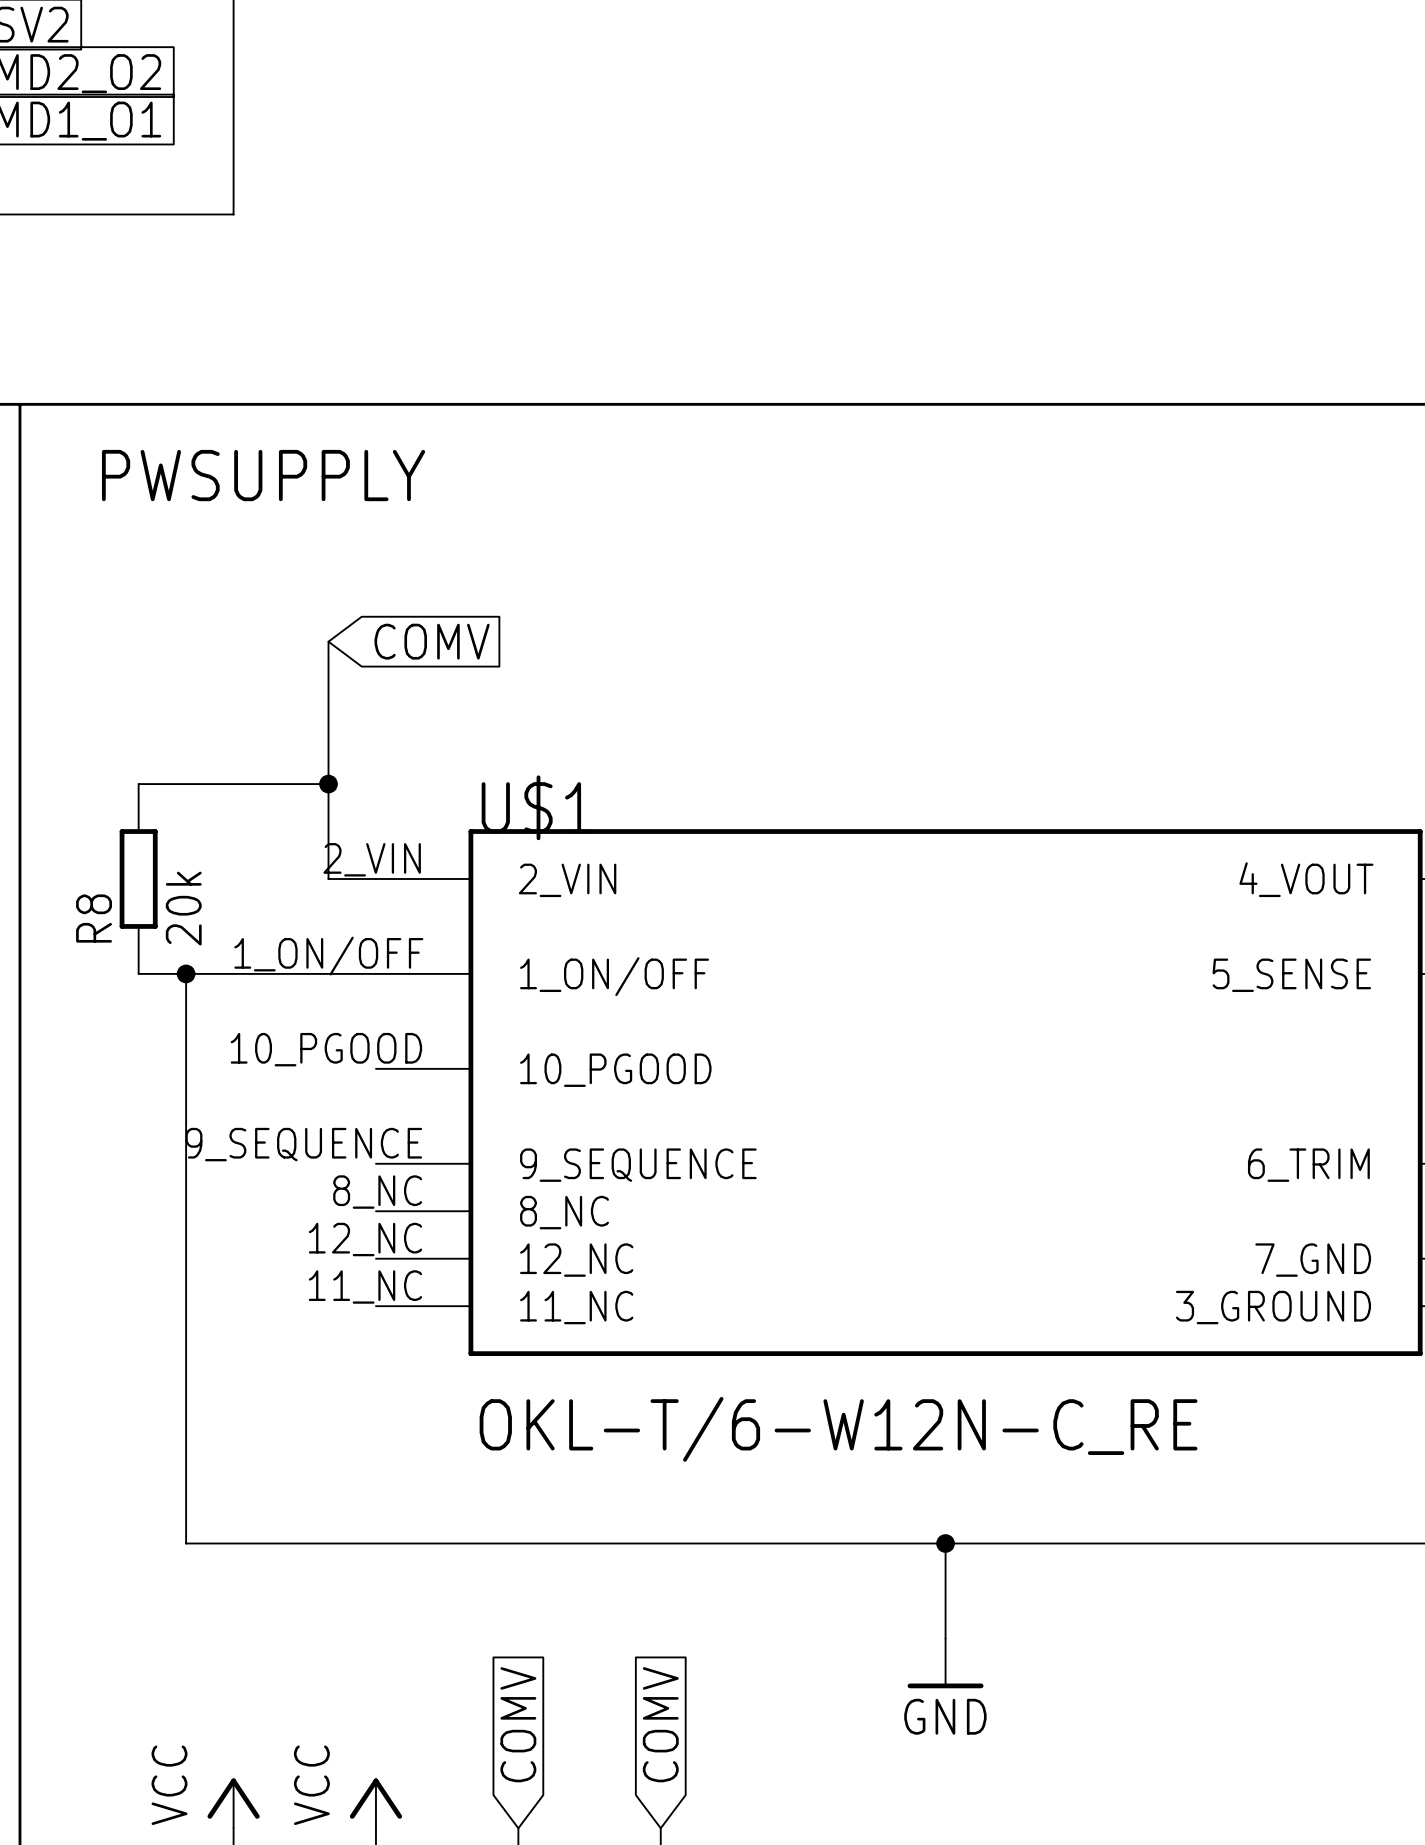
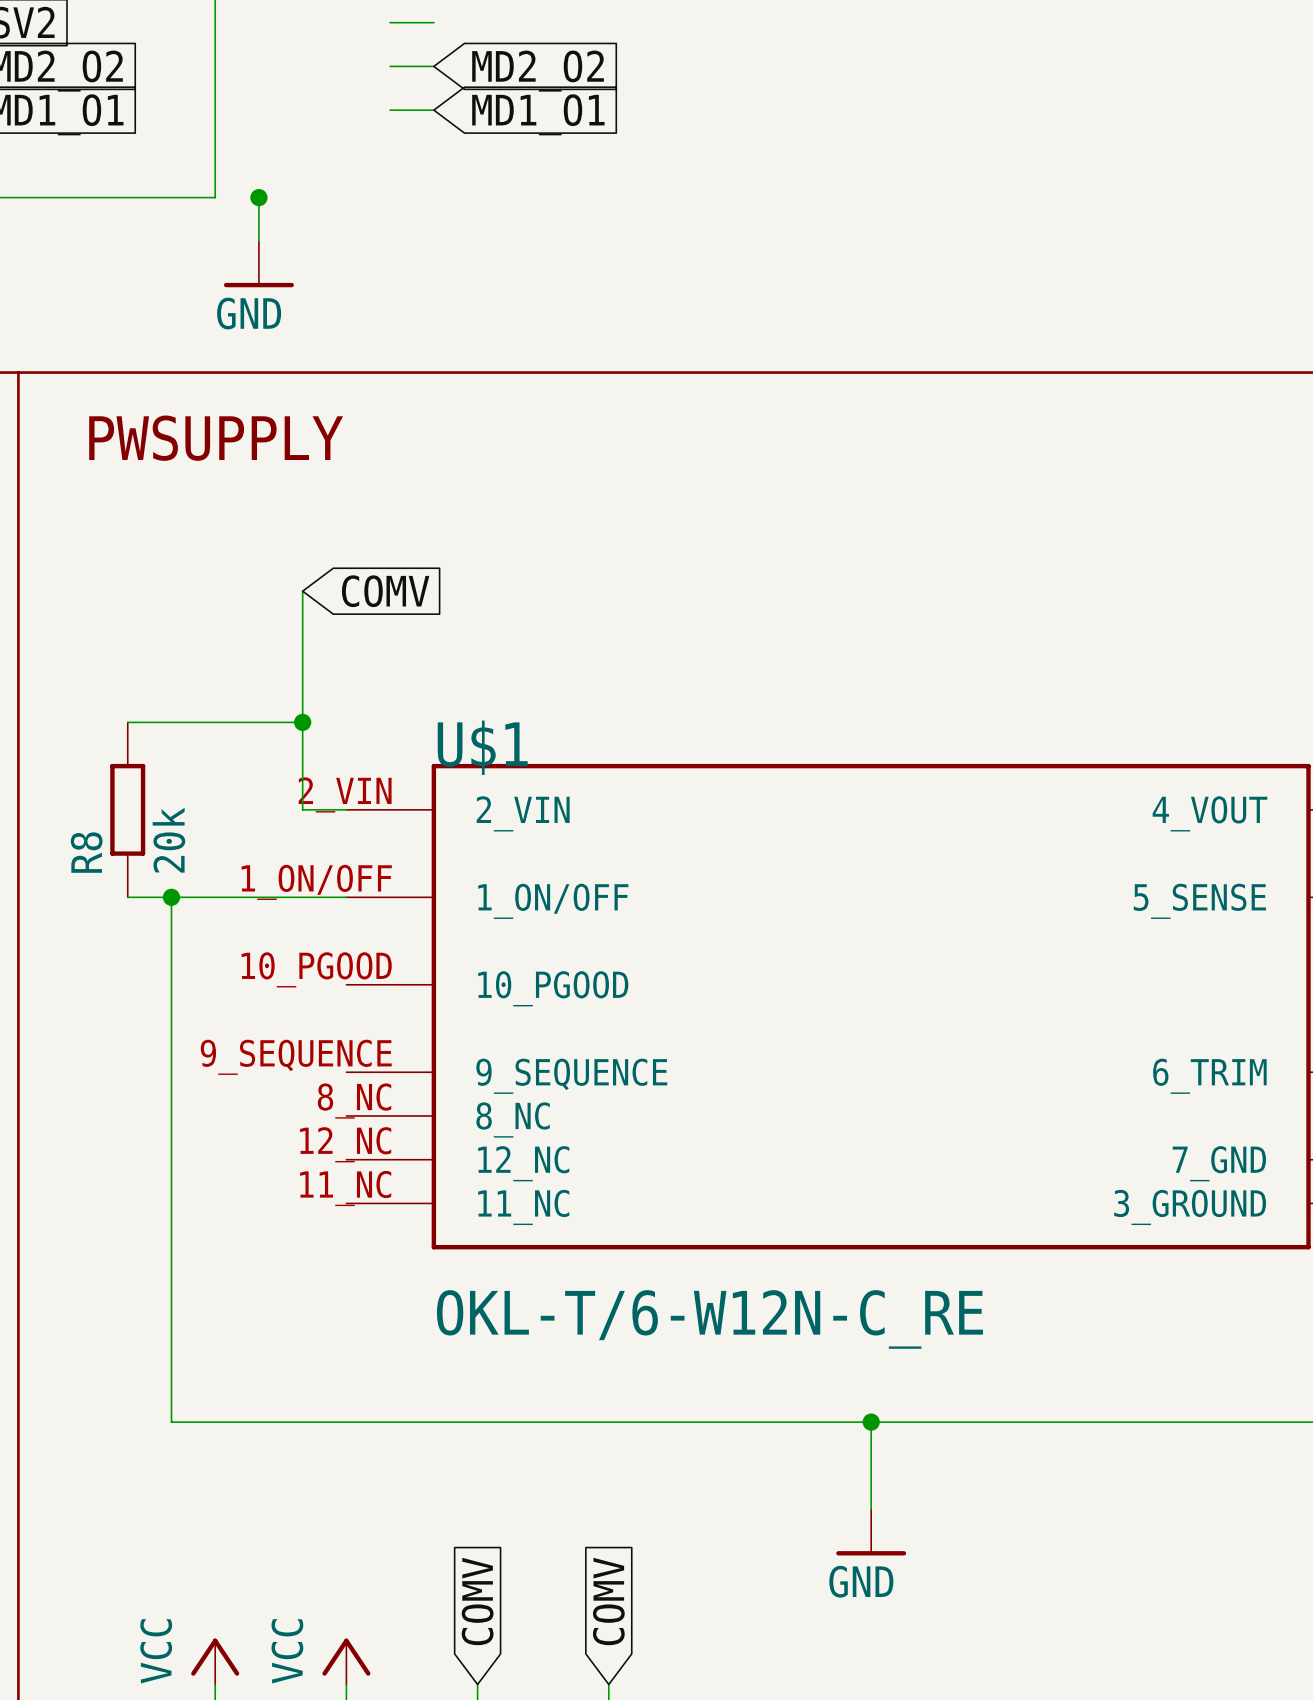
wire: none -> (390, 22) (433, 22)
wire: none -> (390, 66) (433, 66)
global label: none -> MD2_O2 (538, 71)
wire: none -> (390, 110) (433, 110)
global label: none -> MD1_O1 (538, 114)
wire: none -> (258, 197) (258, 241)
junction: none -> (258, 197)
power symbol: none -> GND (258, 264)

